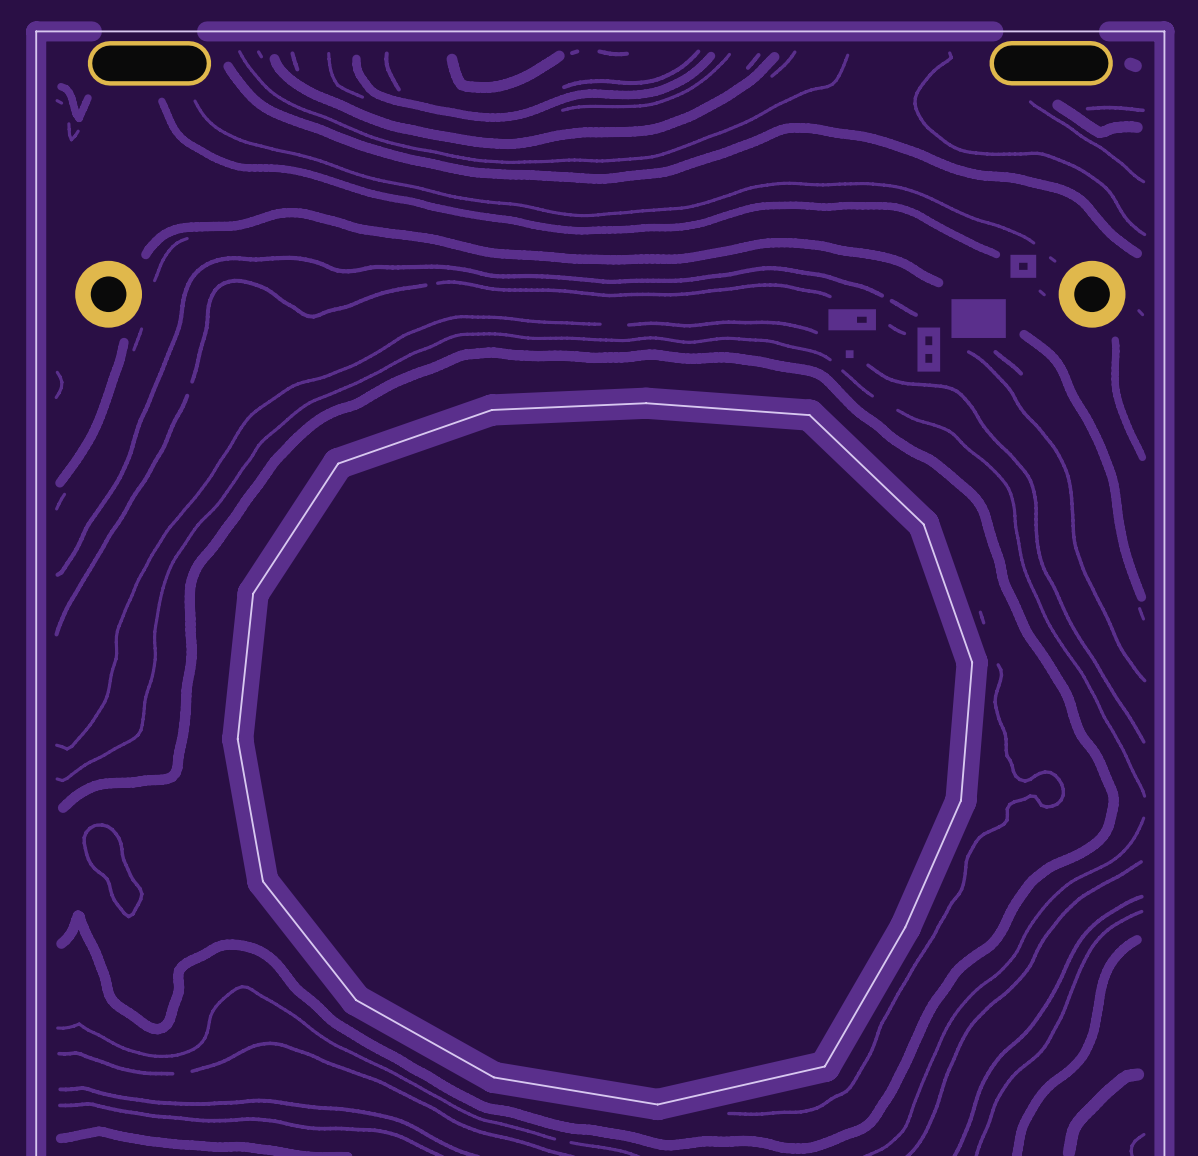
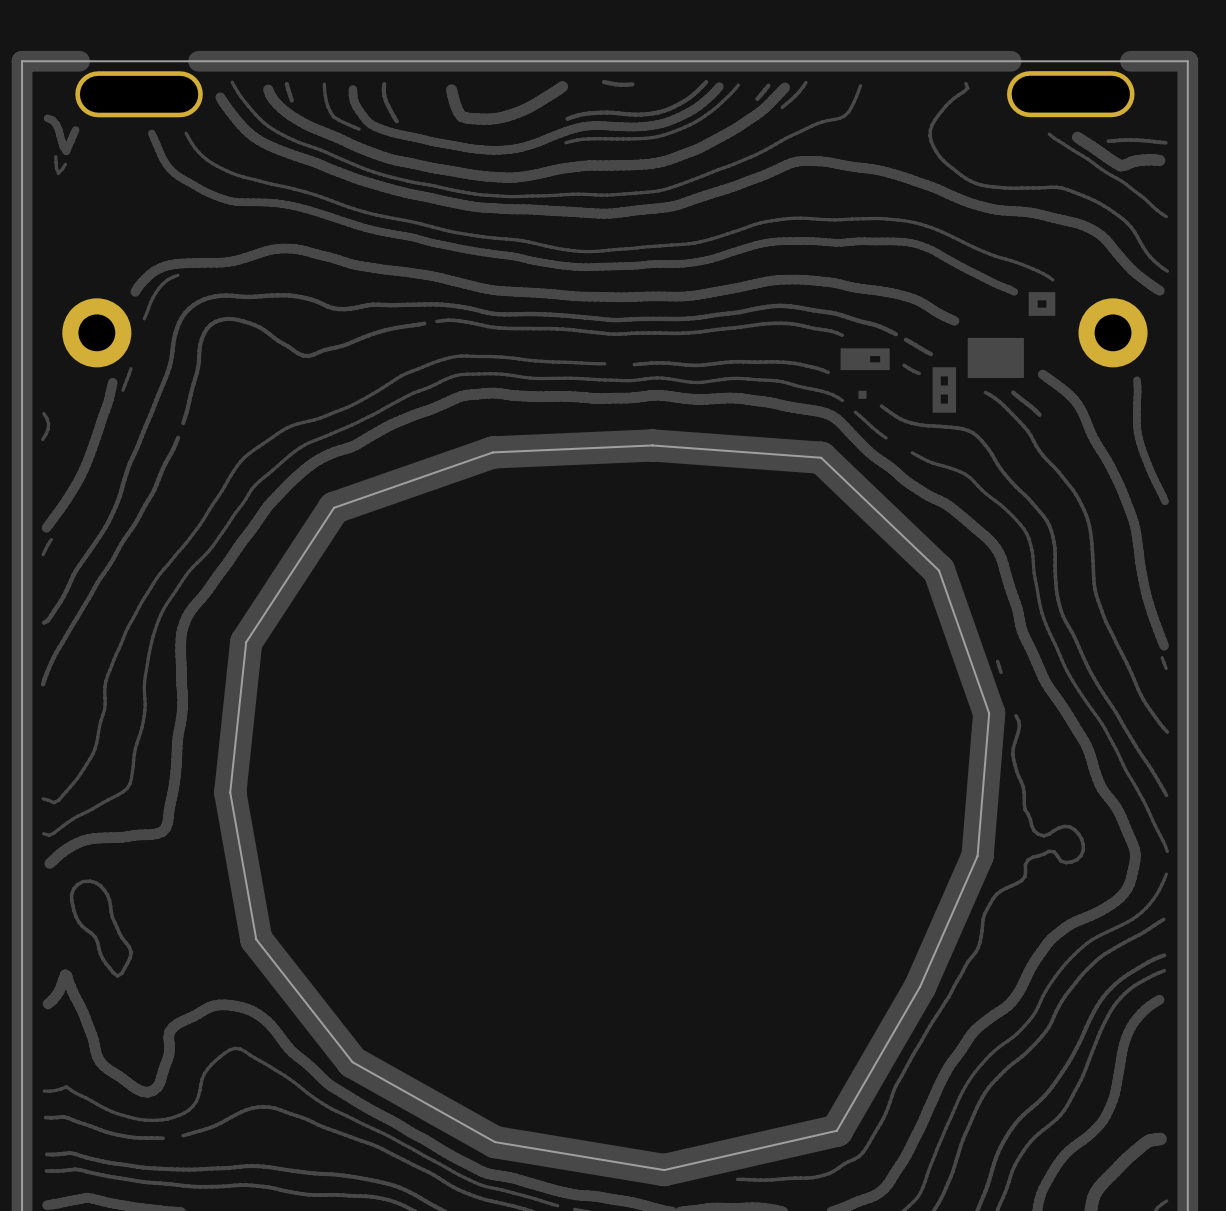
track: (258, 51) (261, 56) -> none
track: (577, 51) (572, 53) -> none
track: (1130, 63) (1135, 65) -> none
track: (57, 100) (61, 103) -> none
track: (1050, 257) (1054, 261) -> none
track: (1040, 291) (1044, 294) -> none
track: (1138, 310) (1142, 314) -> none

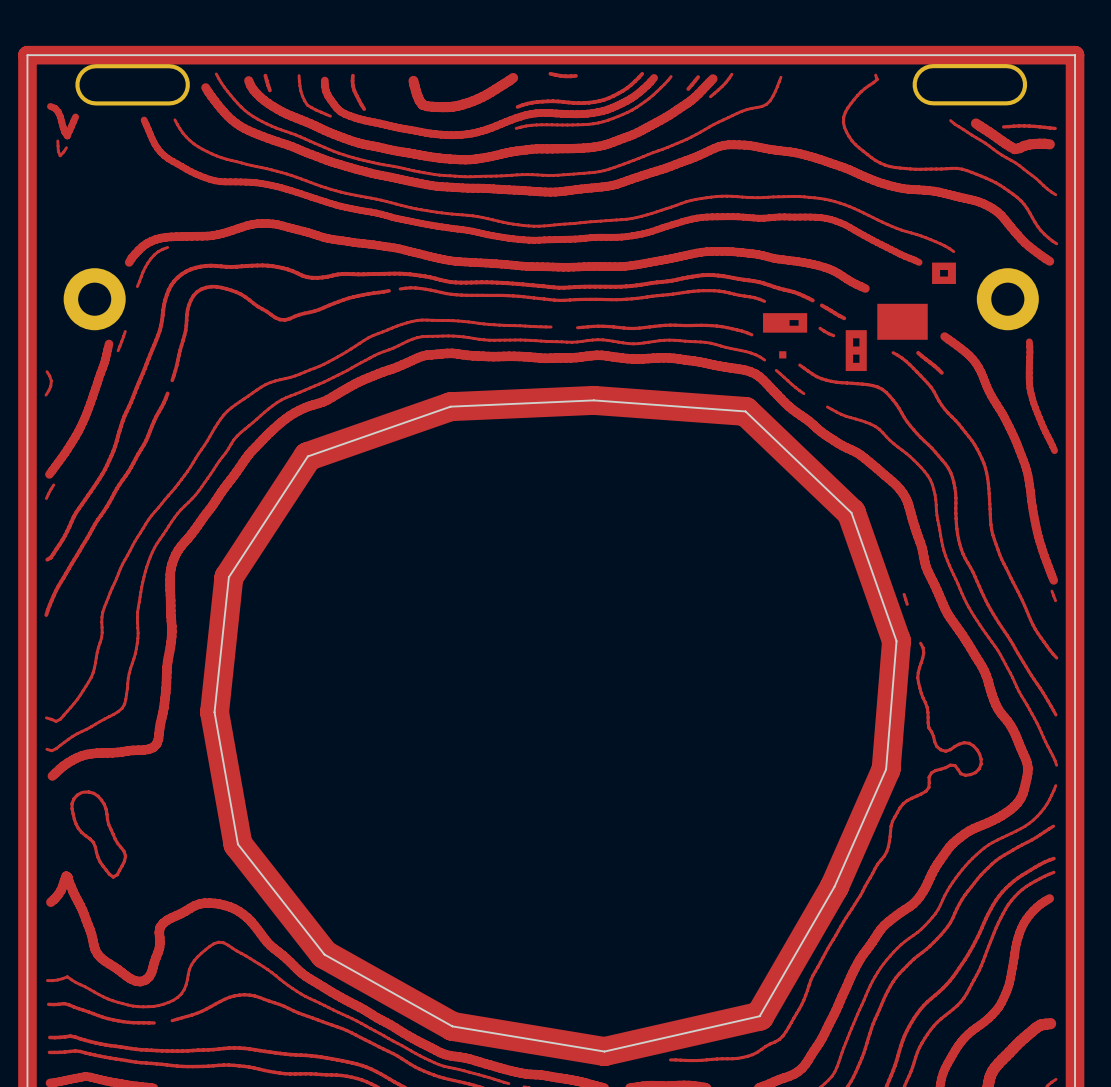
track: none -> (79, 55) (186, 55)
track: none -> (916, 55) (1023, 55)

